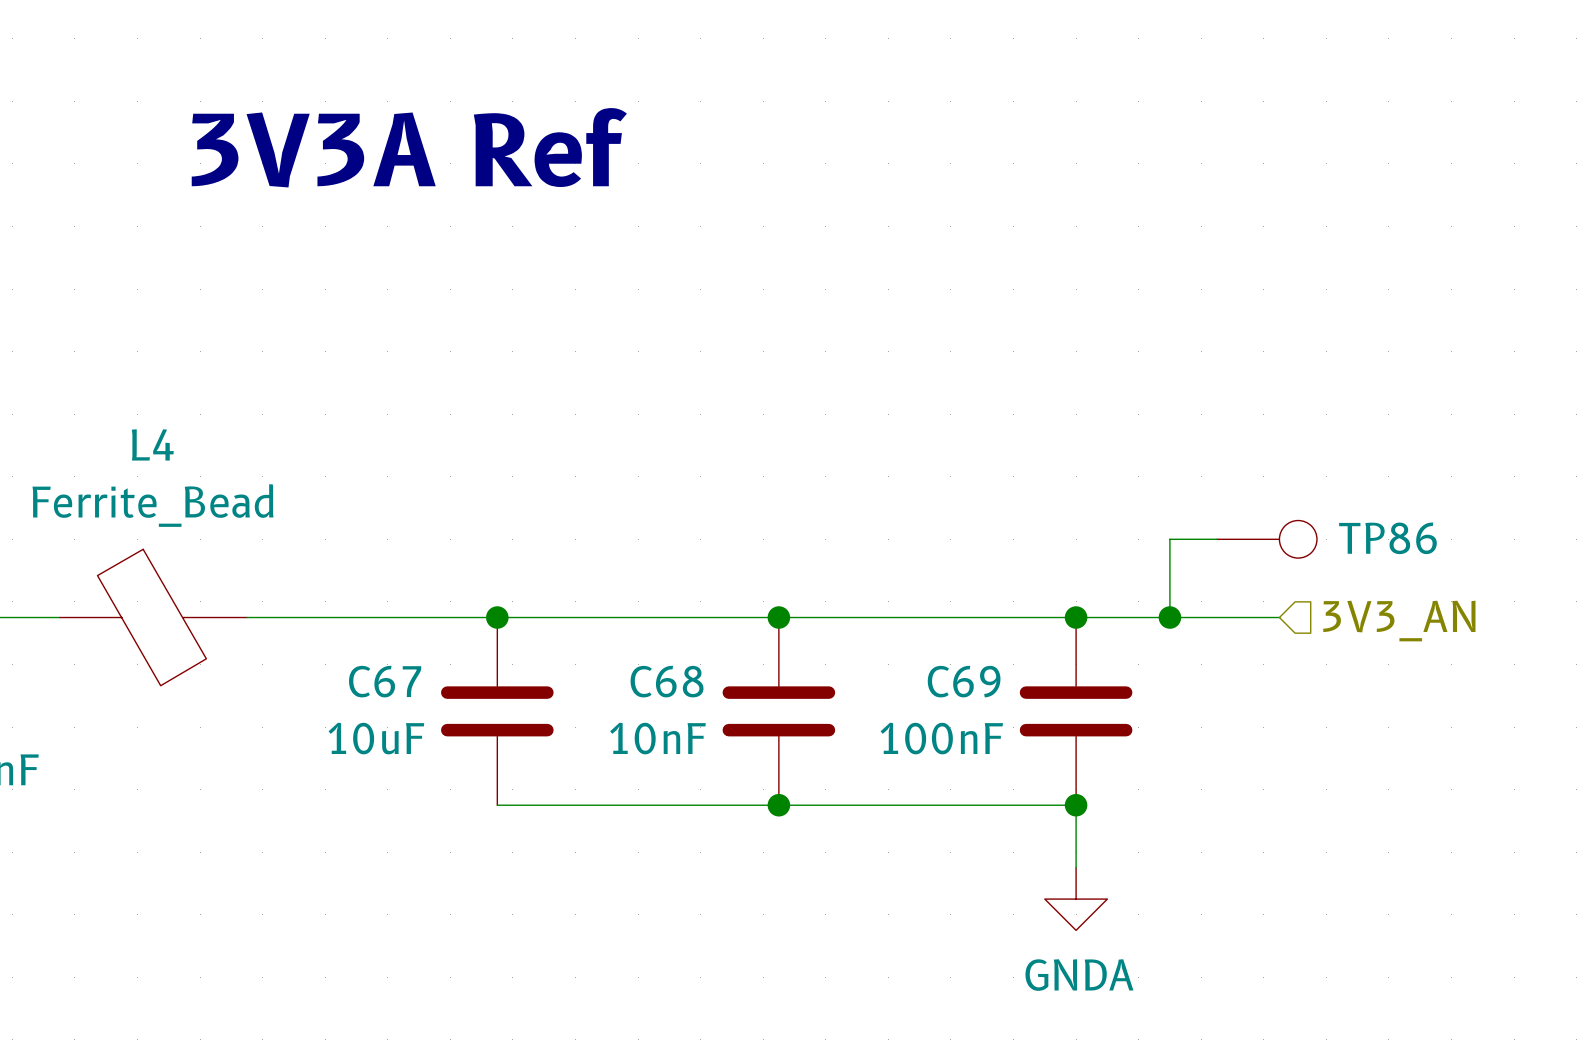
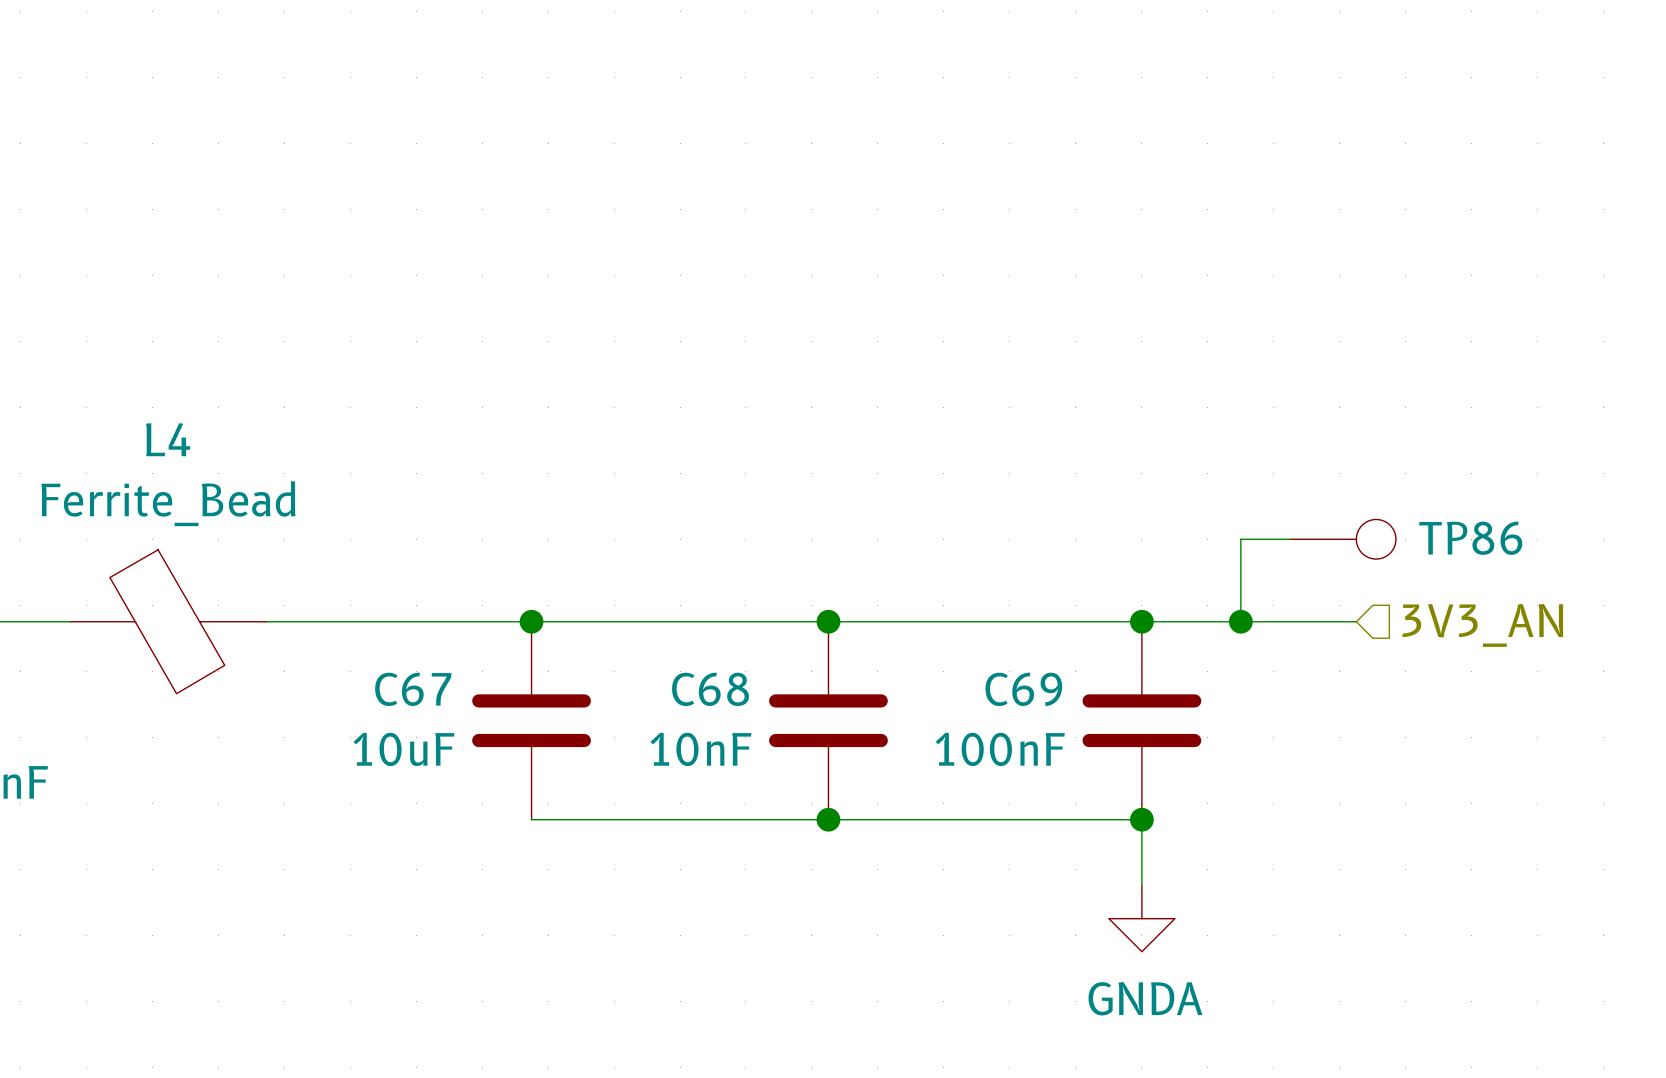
text: 3V3A Ref (409, 147) -> none

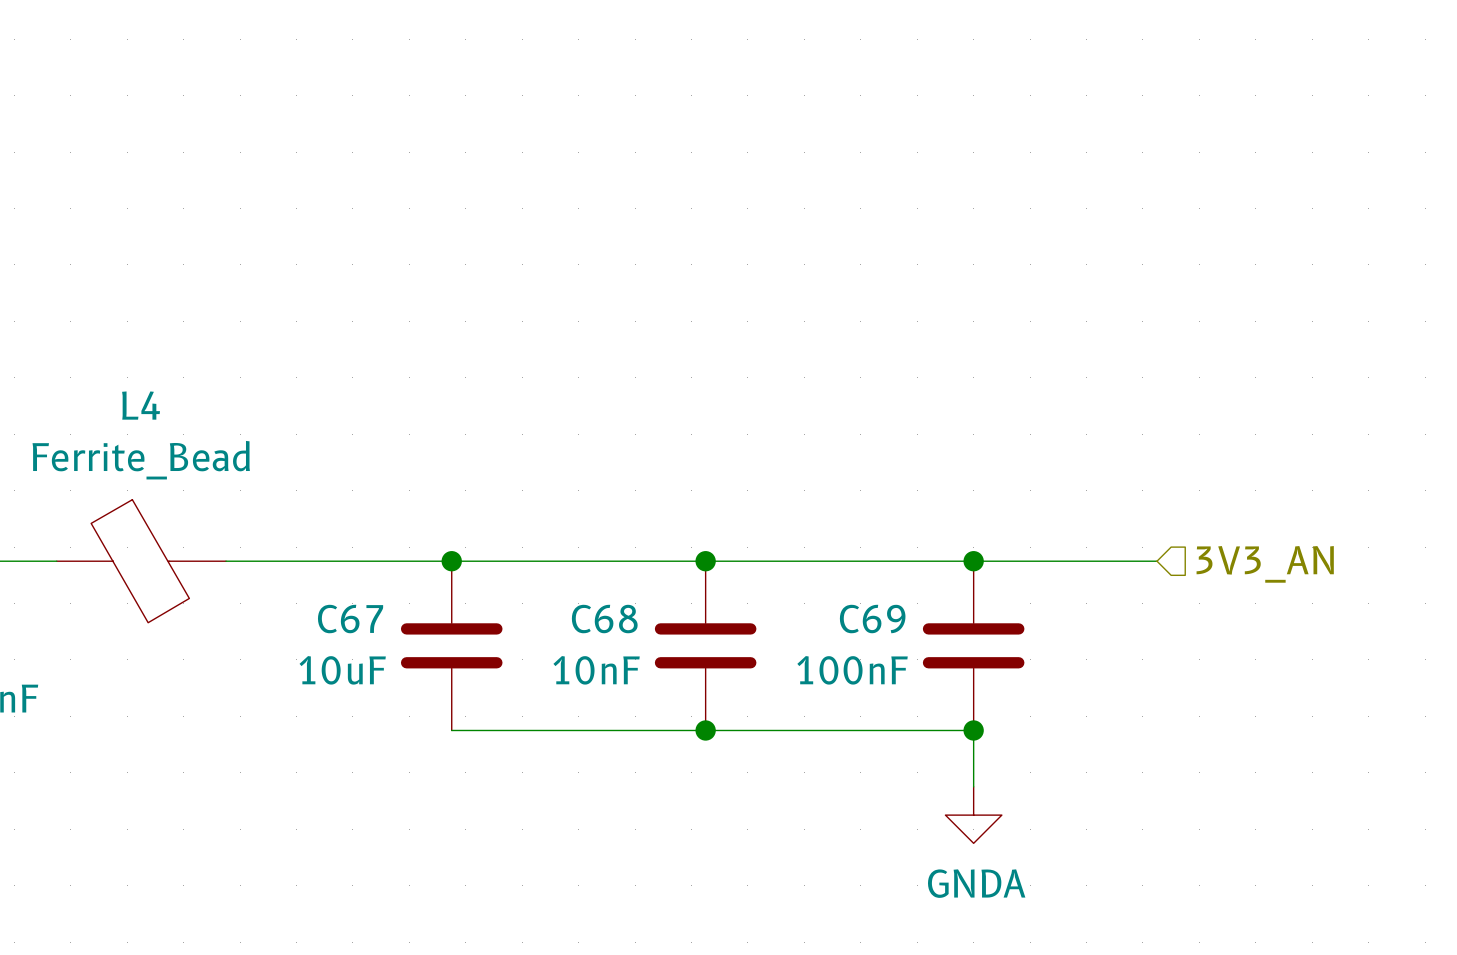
wire: (1290, 539) (1240, 539) (1240, 621) -> none
TP86: (1343, 539) -> none
junction: (1240, 621) -> none

